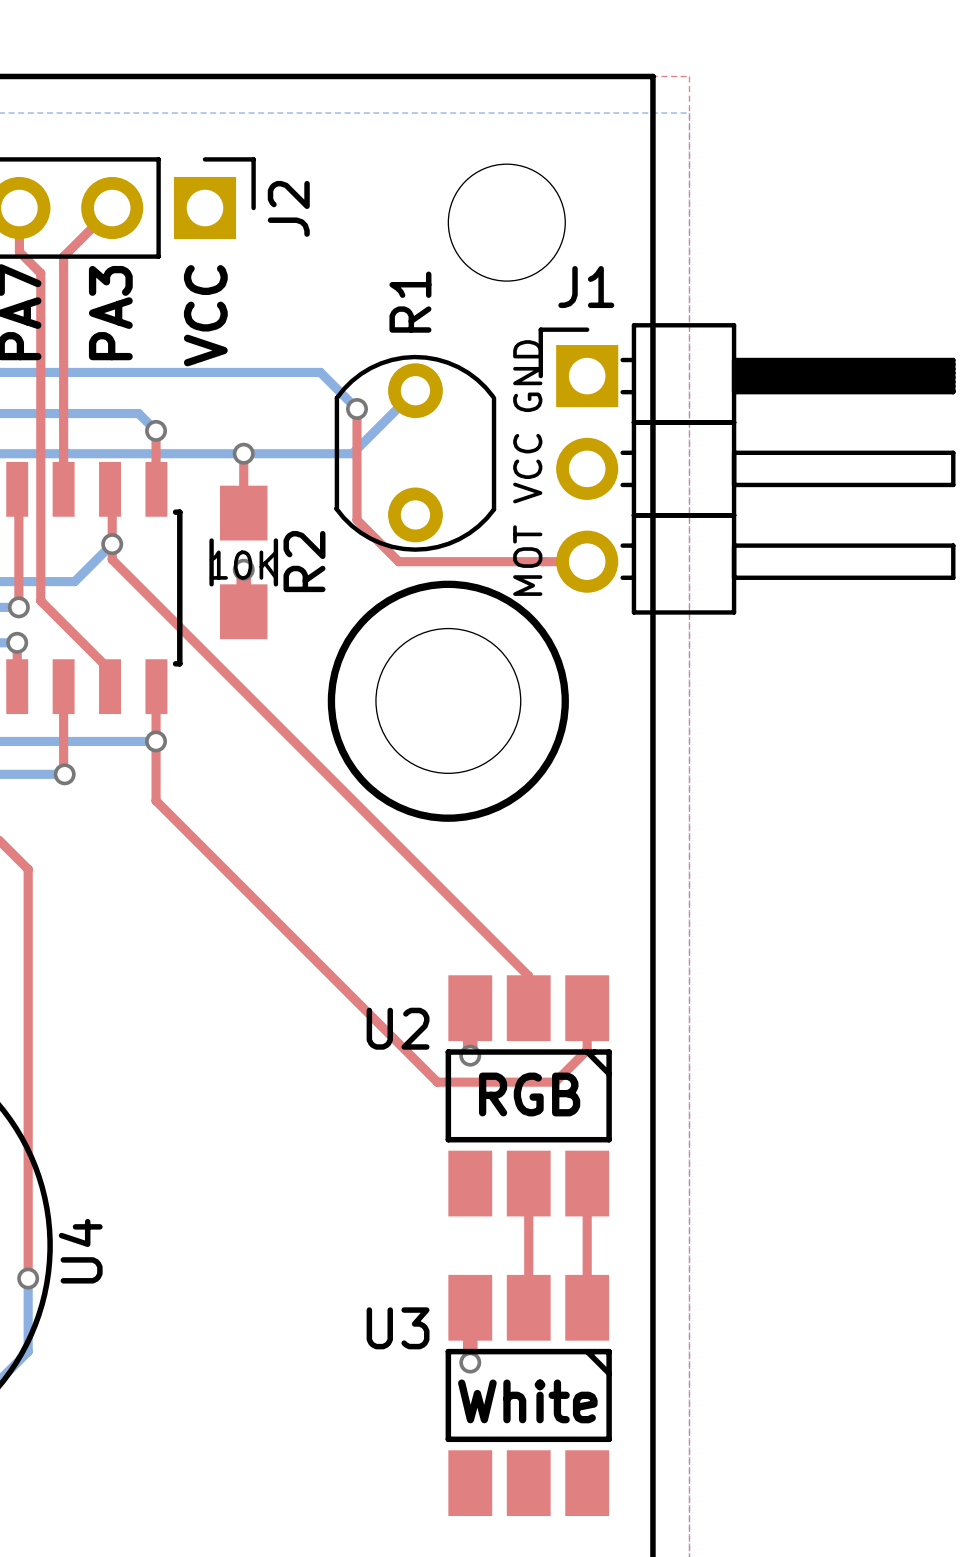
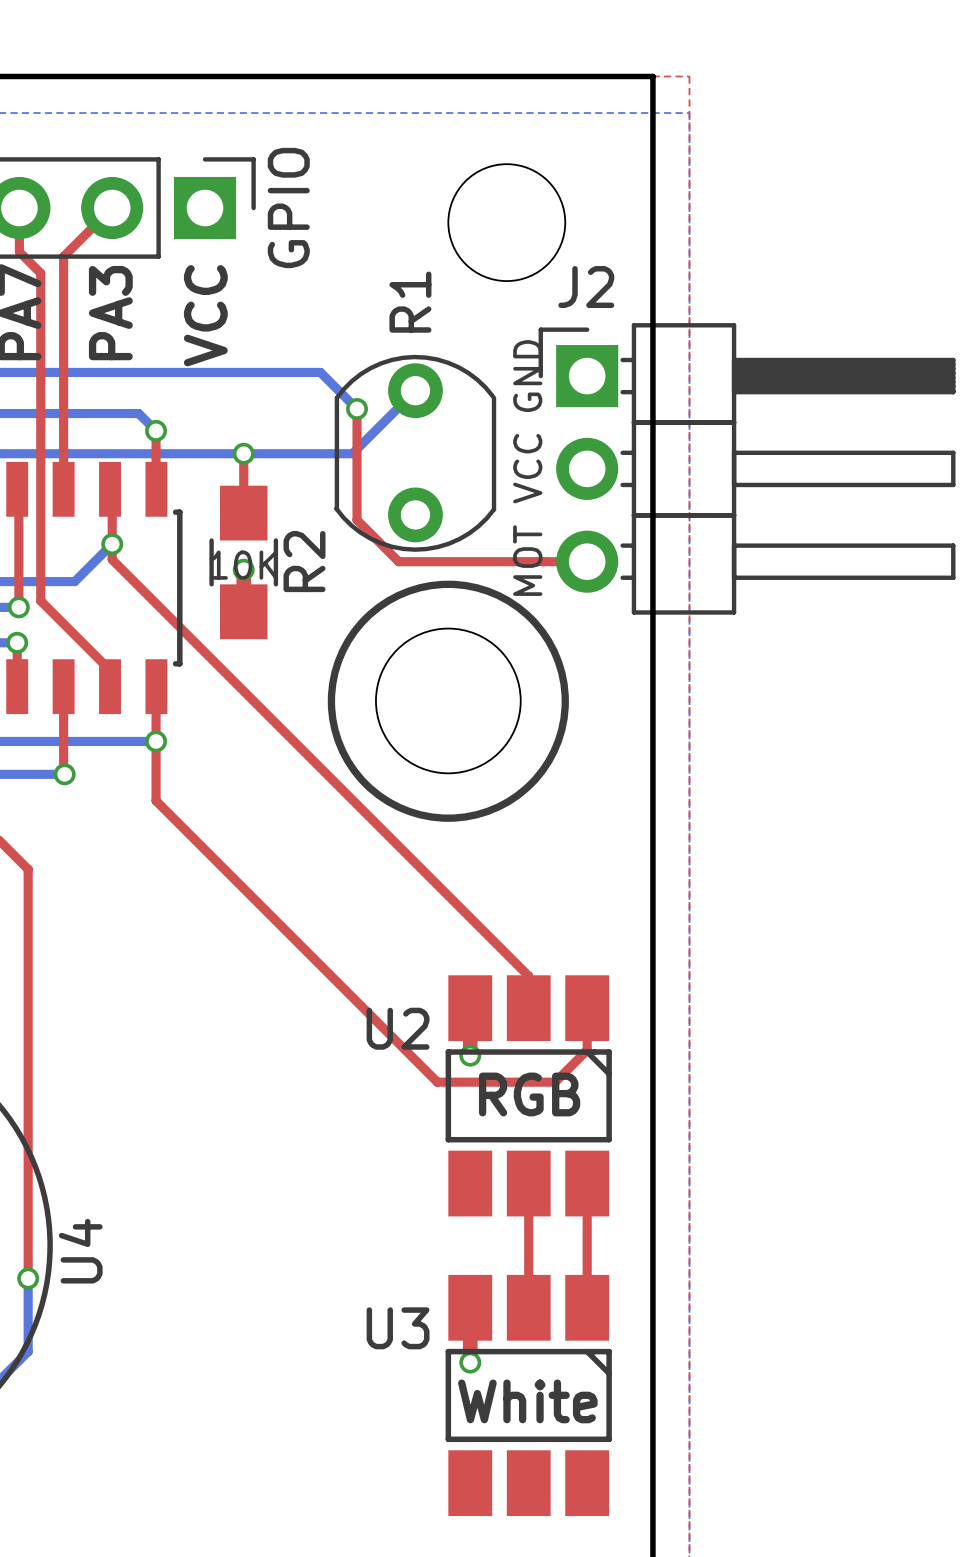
J2 name: J2 (288, 208) -> GPIO (288, 208)
J1 name: J1 (586, 287) -> J2 (586, 287)

